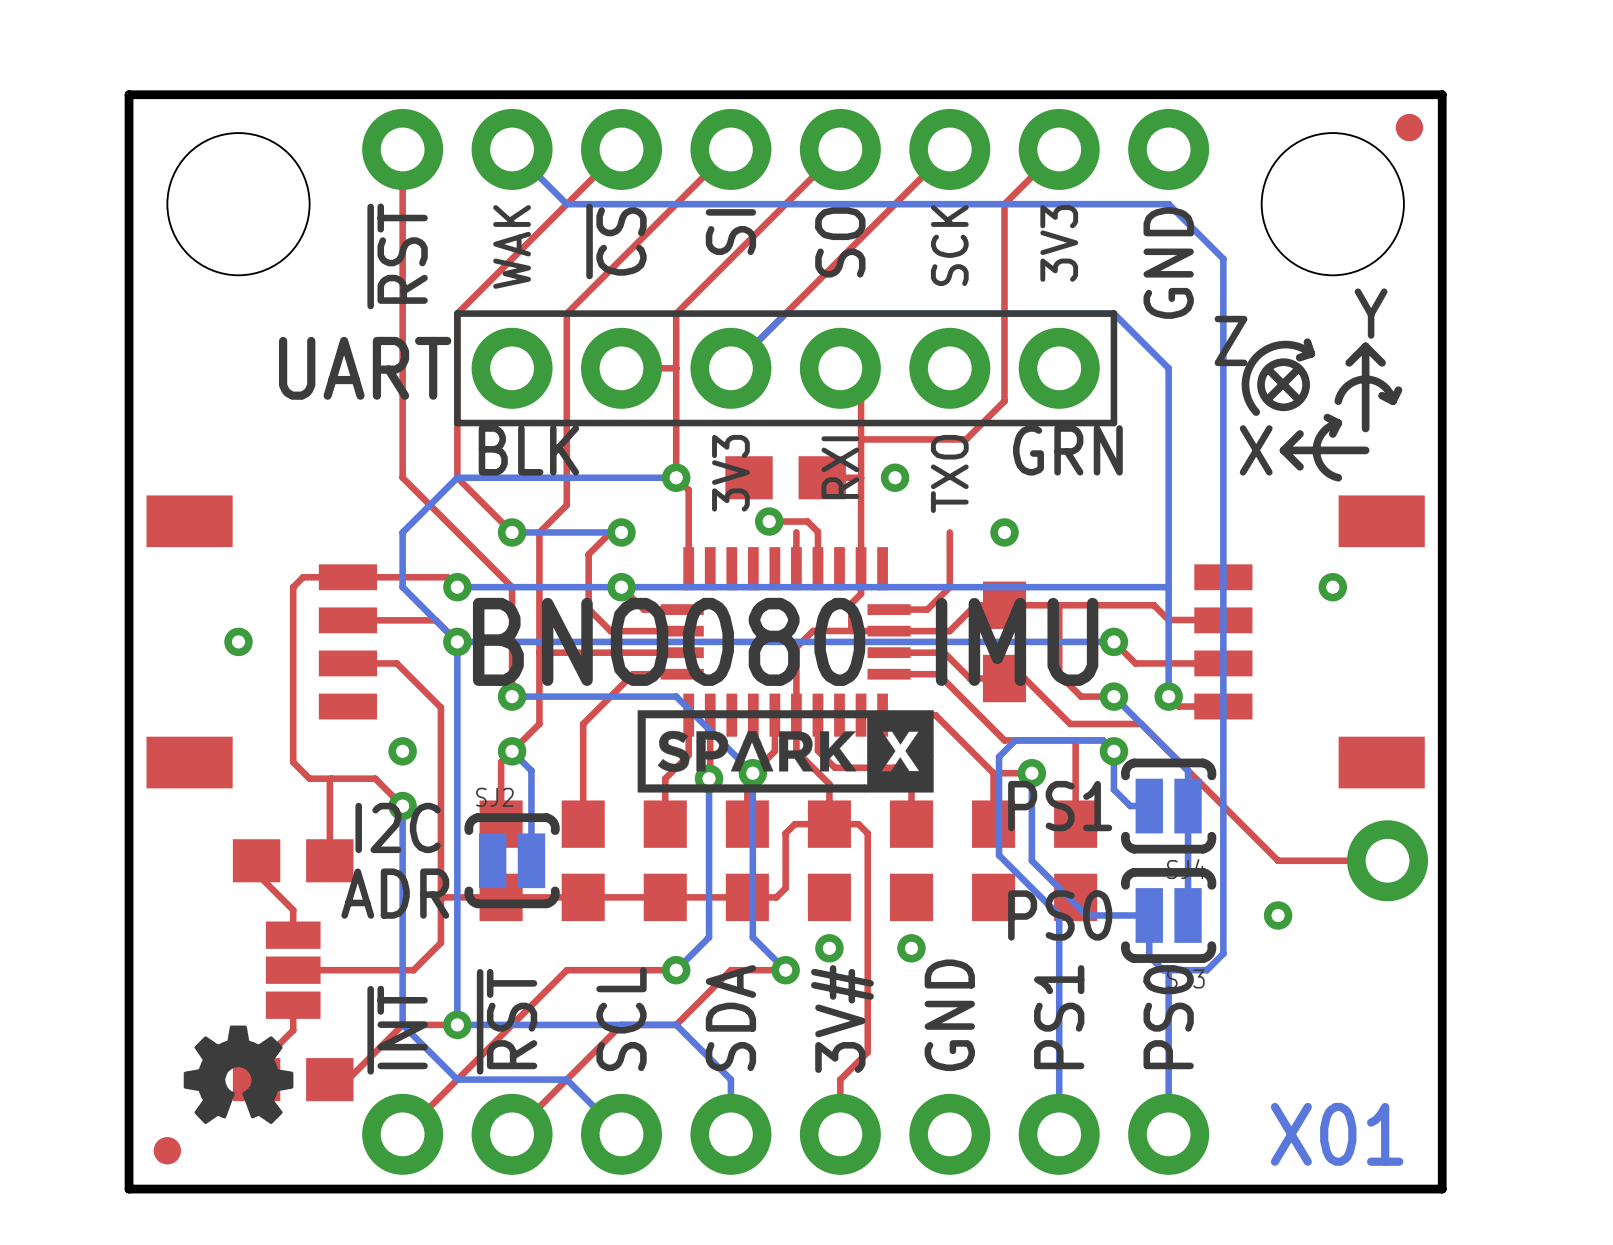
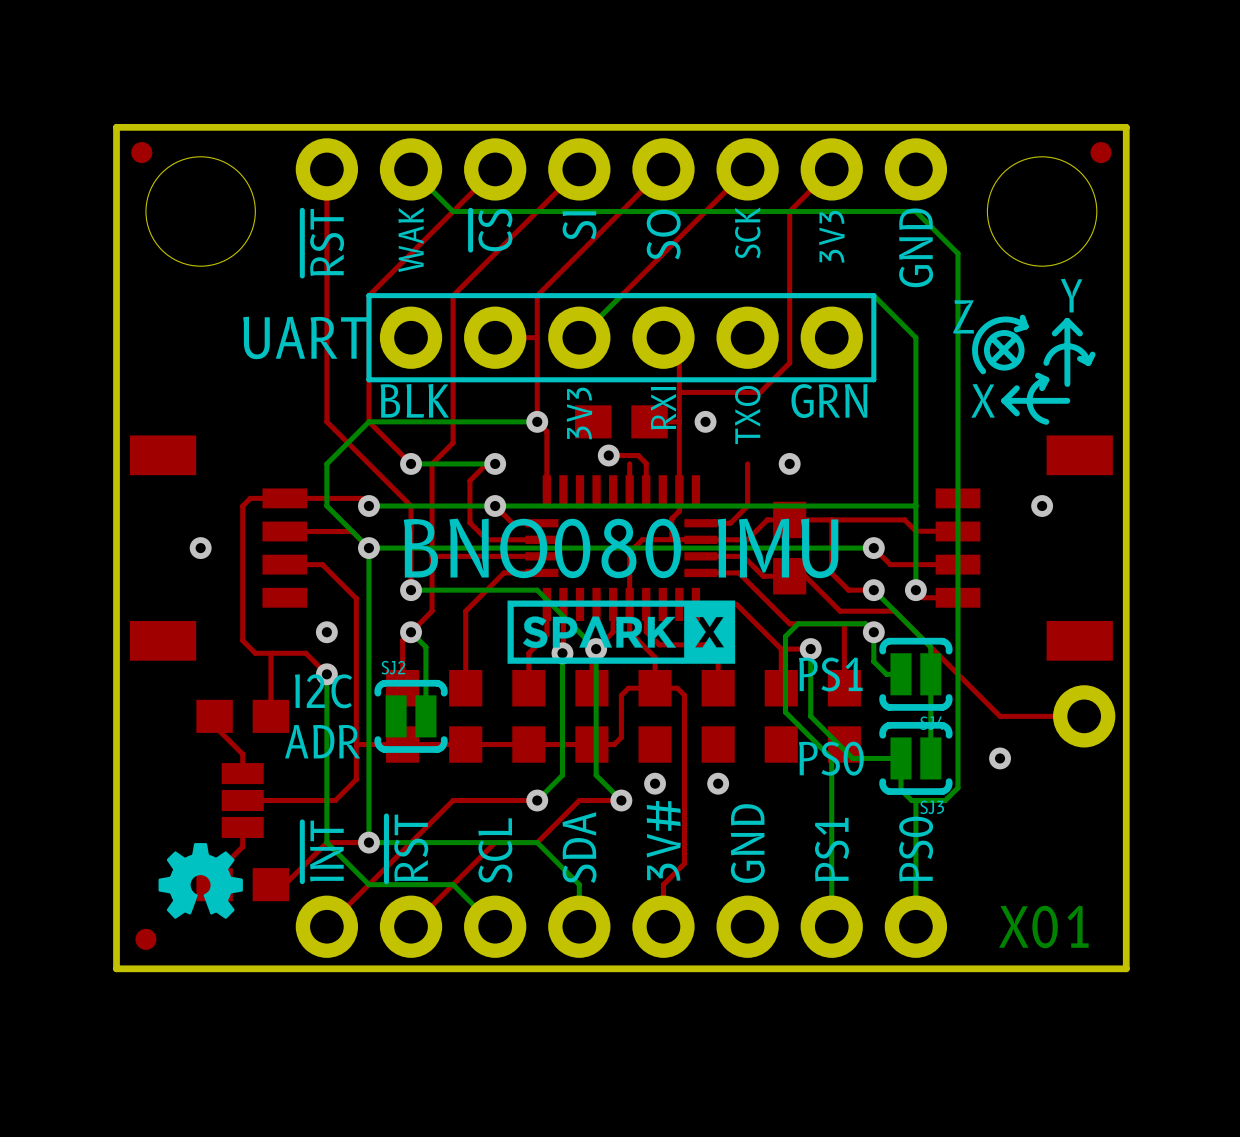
part: none -> (141, 152)

